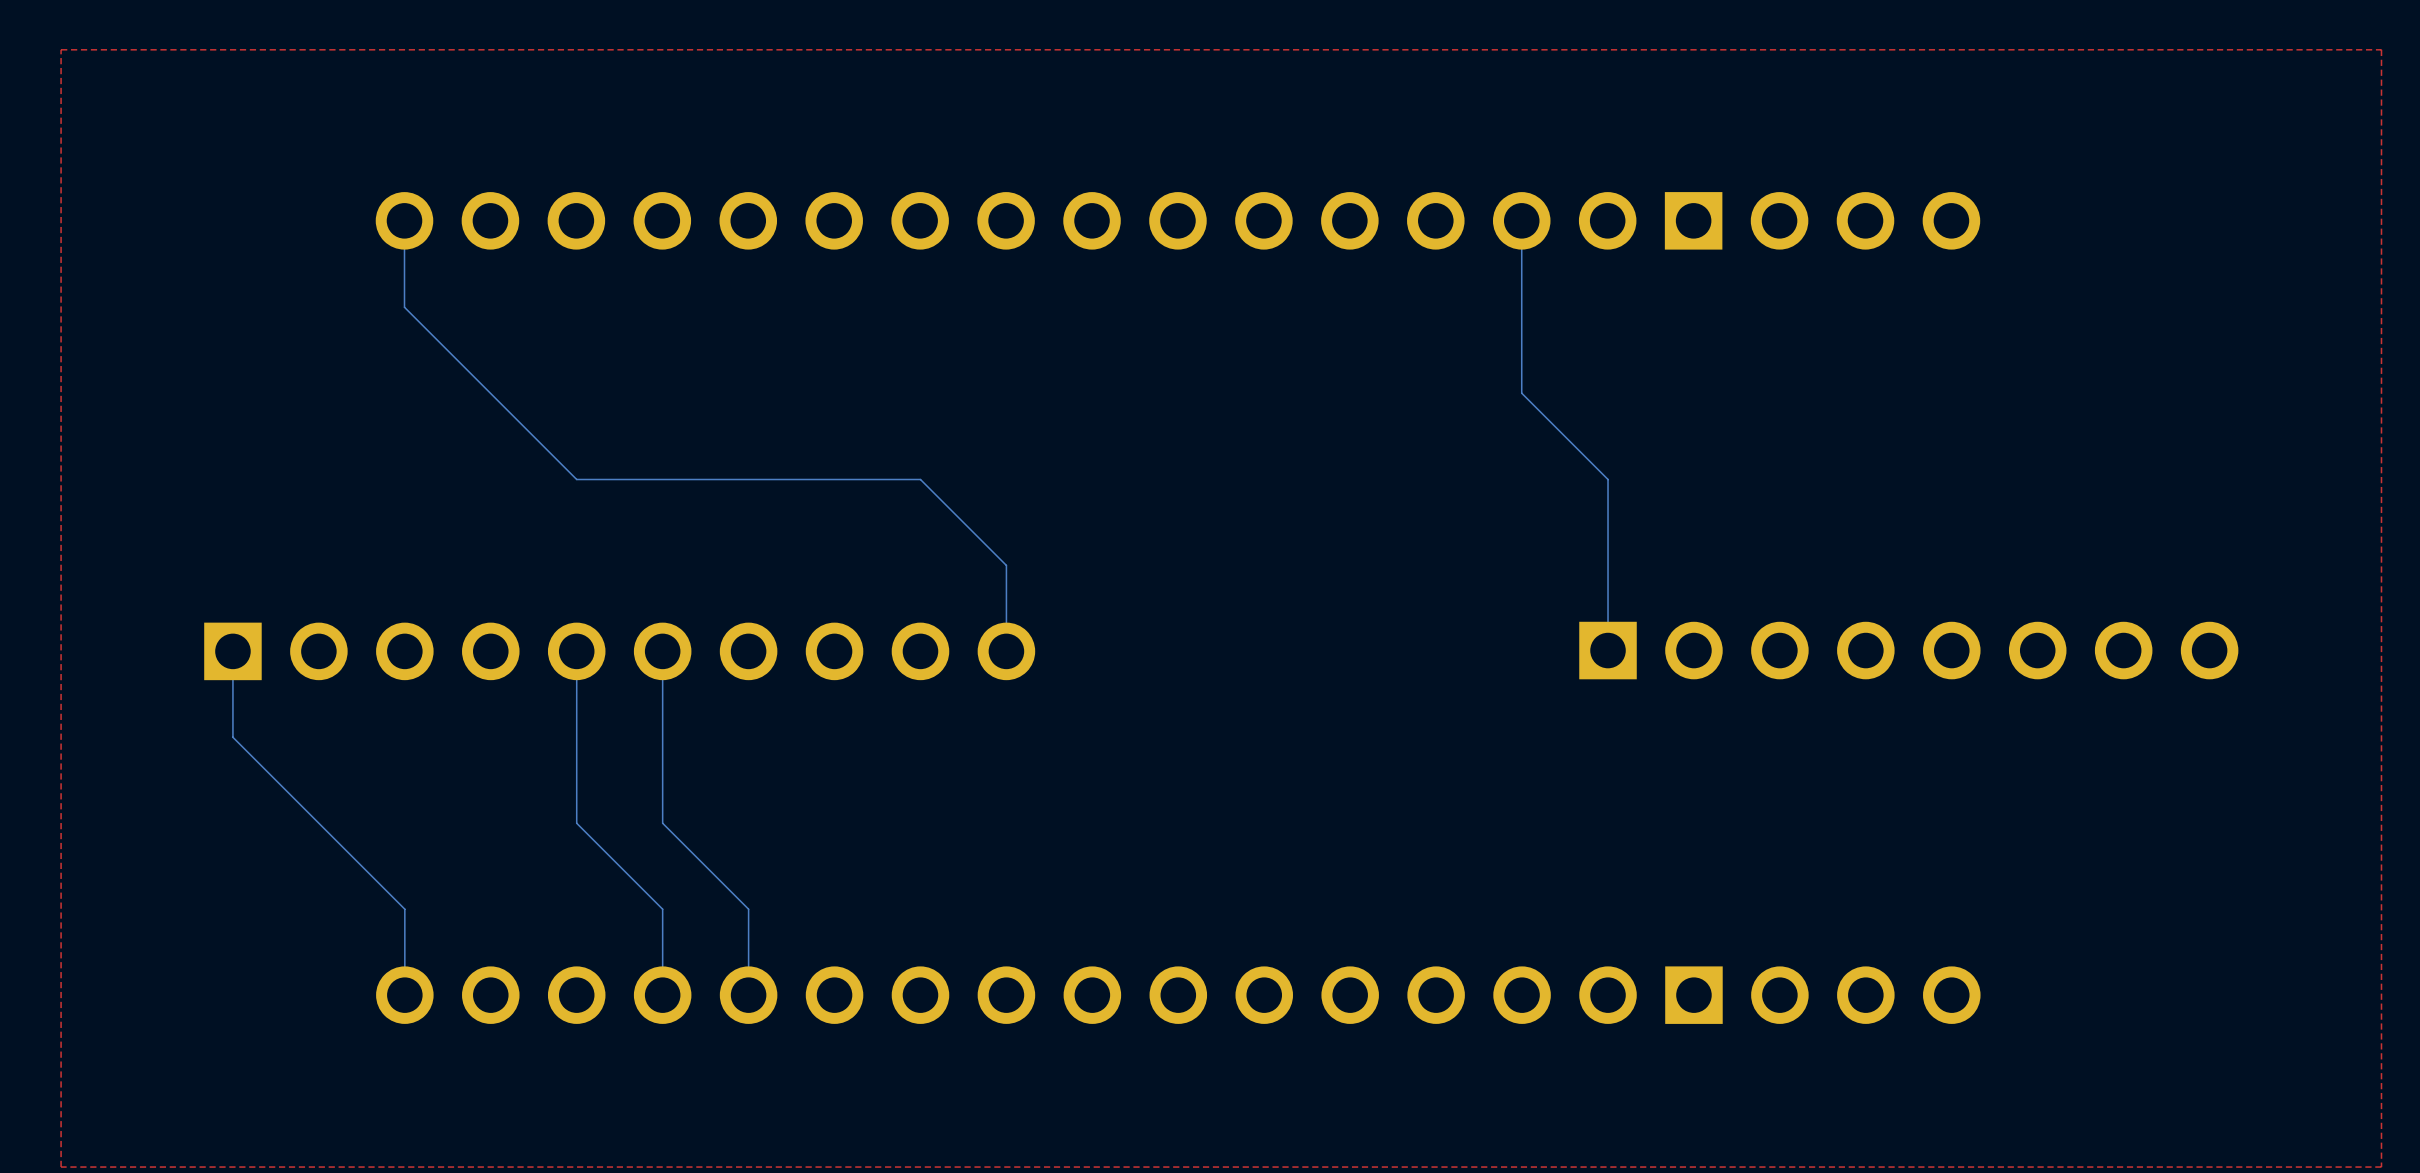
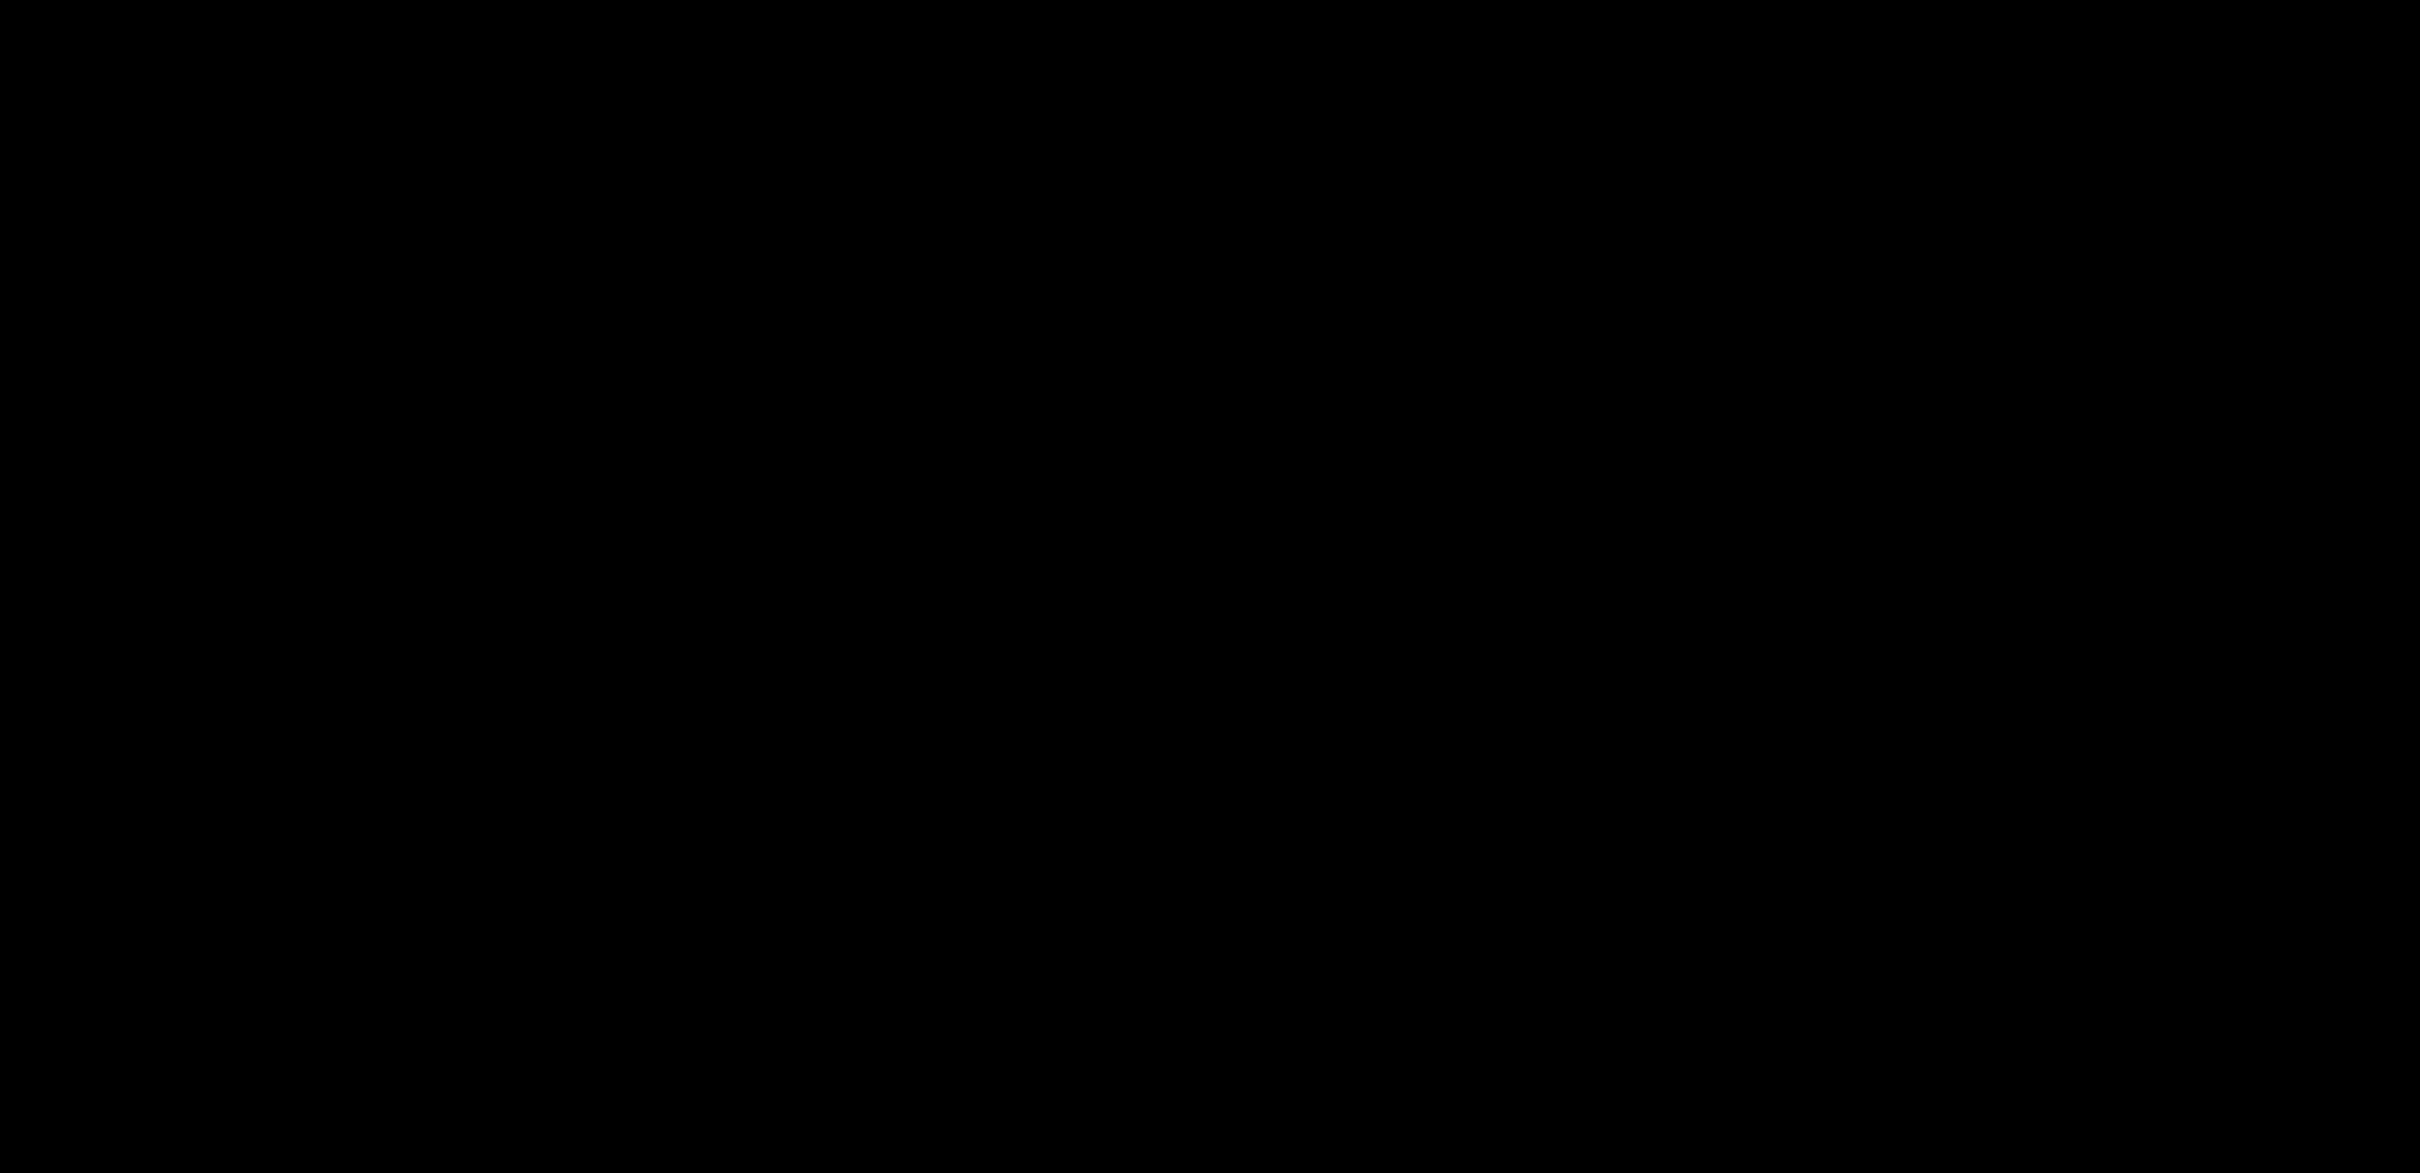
top zone outline: (2381, 49) (2381, 1167) (61, 1167) (61, 49) (2381, 49) -> none
bottom track: (404, 220) (404, 307) (576, 479) (920, 479) (1006, 565) (1006, 651) -> none
part: (1177, 220) -> none
bottom track: (1521, 220) (1521, 393) (1608, 479) (1608, 650) -> none
part: (1908, 650) -> none
bottom track: (232, 651) (232, 737) (404, 909) (404, 995) -> none
bottom track: (576, 651) (576, 823) (662, 909) (662, 995) -> none
part: (619, 651) -> none
bottom track: (662, 651) (662, 823) (748, 909) (748, 995) -> none
part: (1178, 995) -> none

